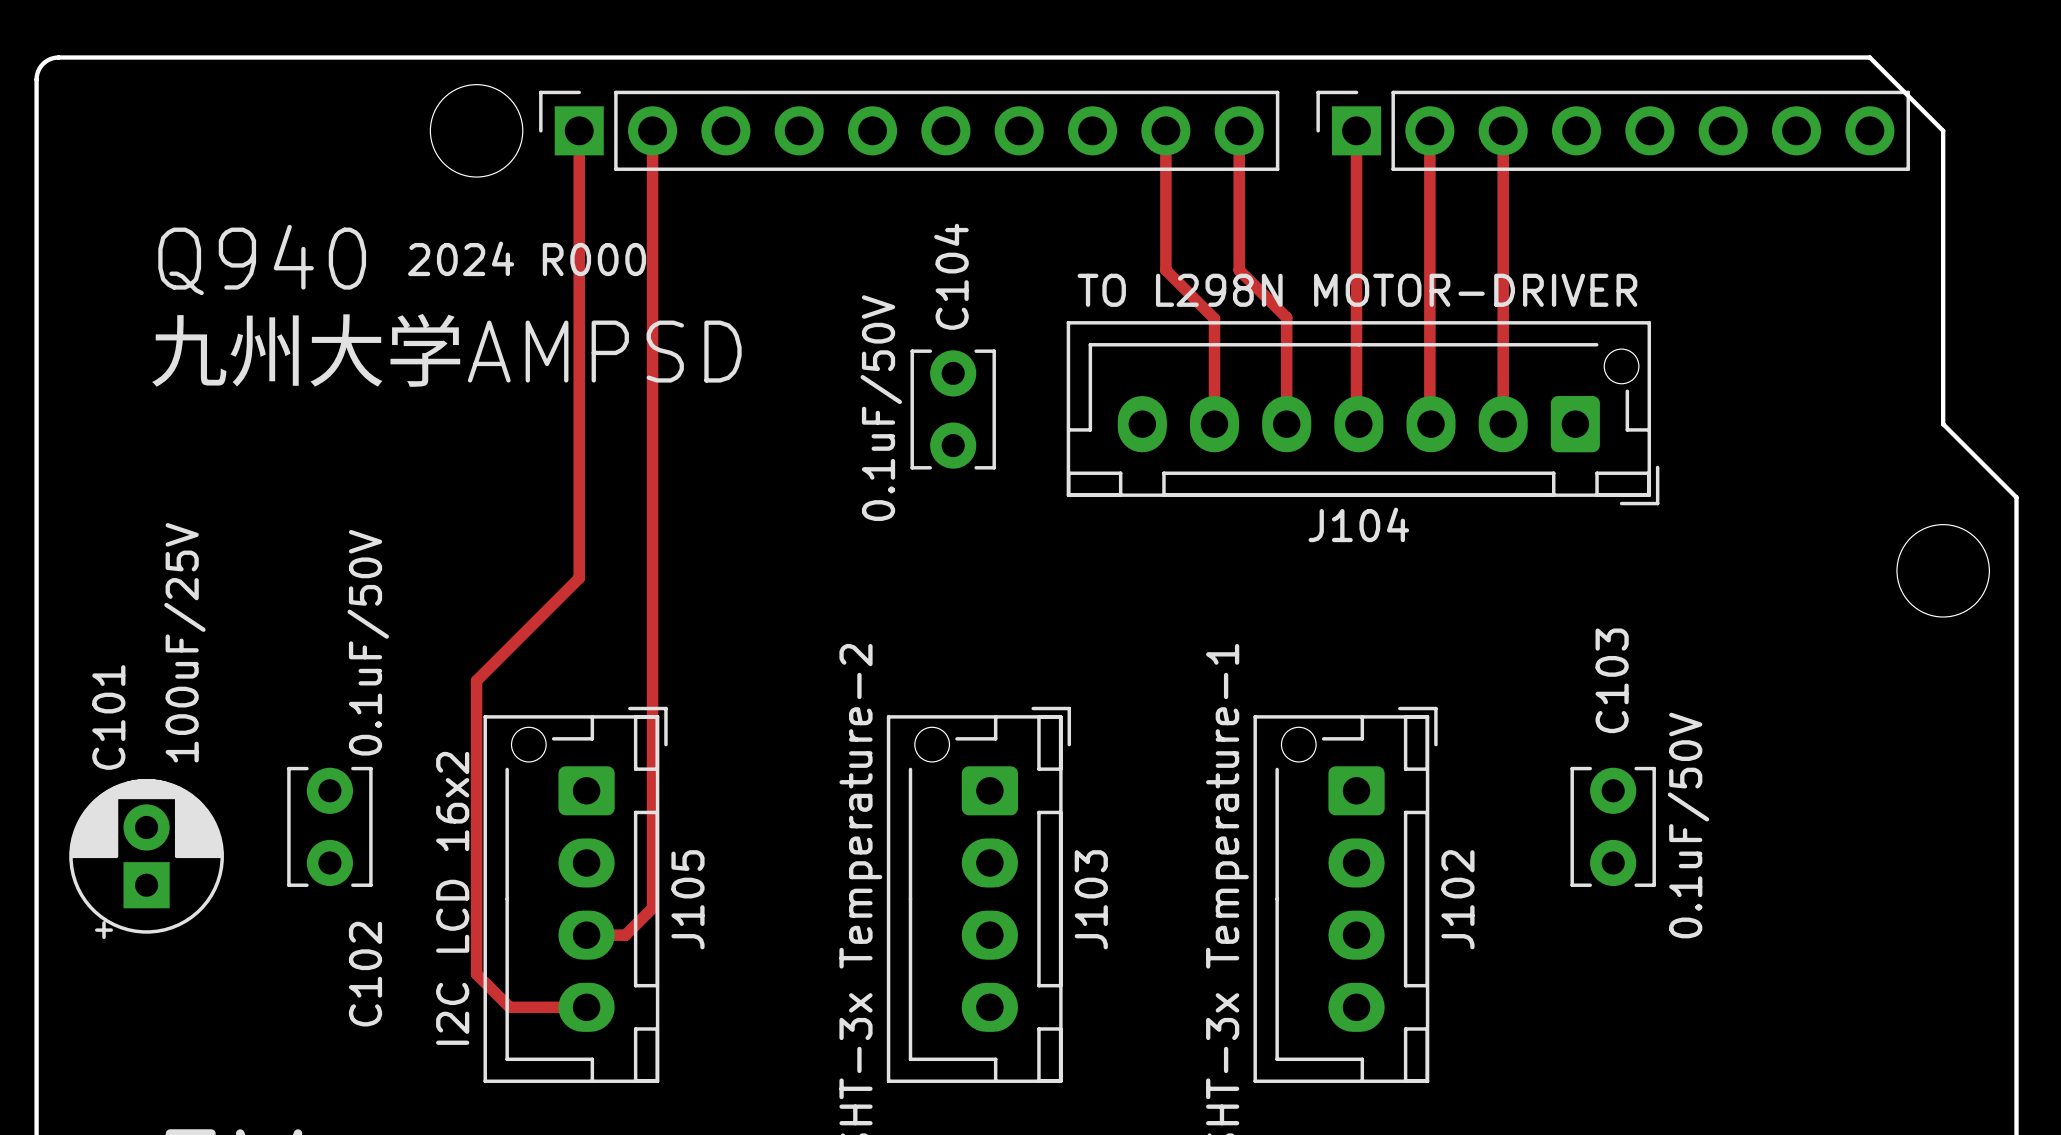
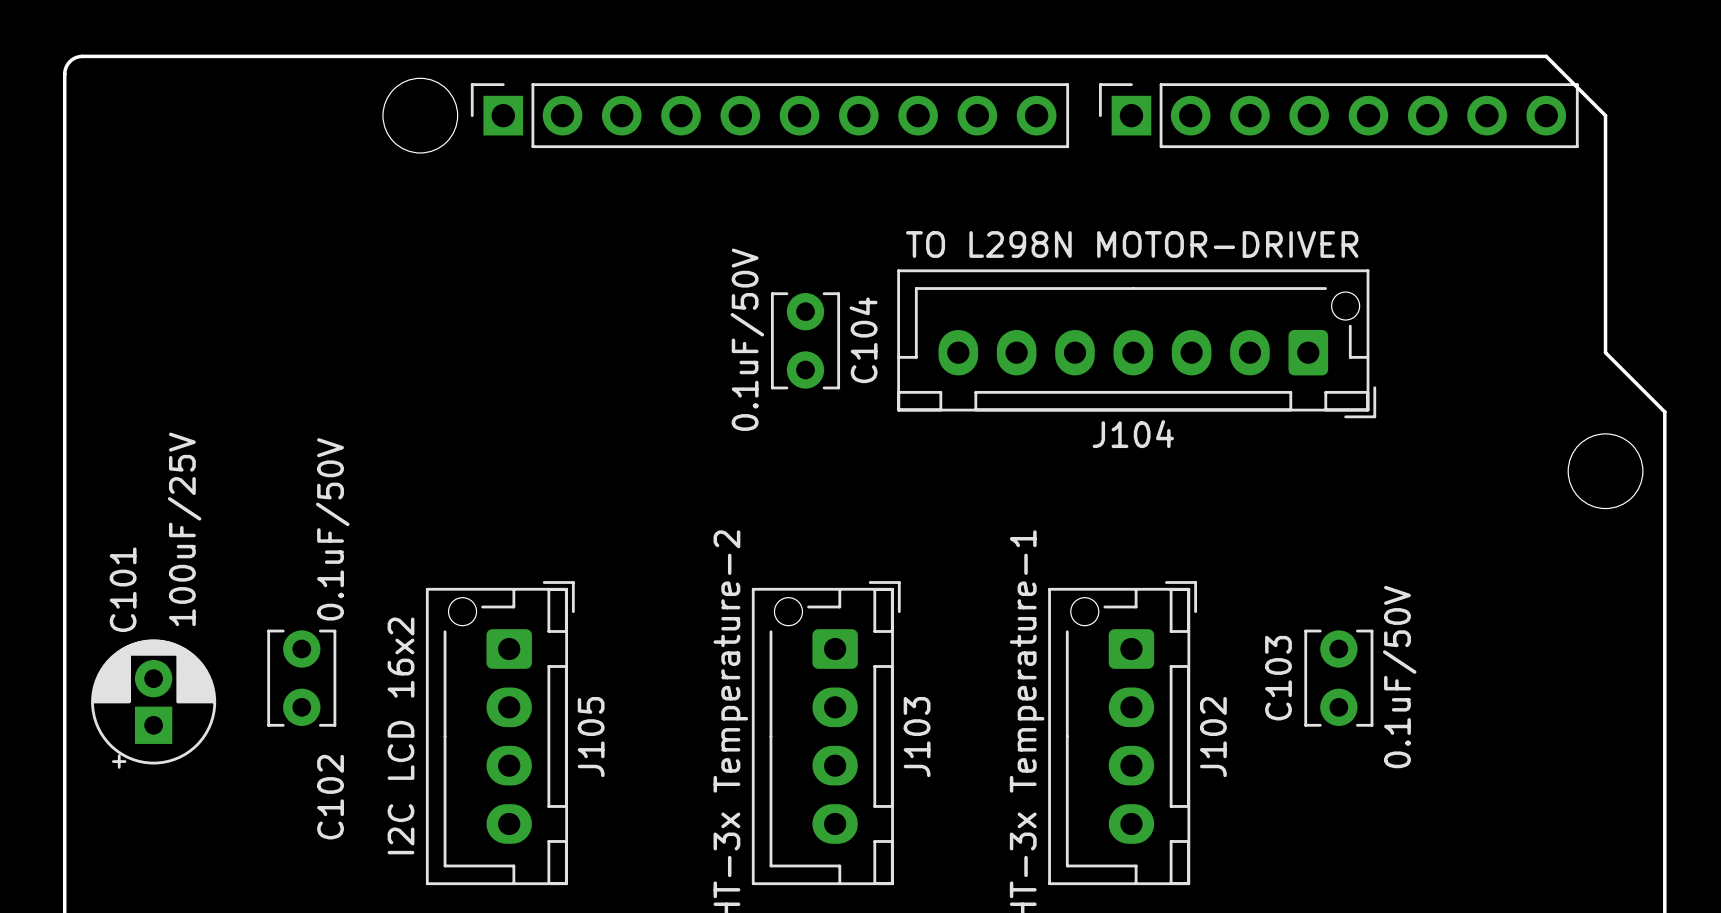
track: (579, 130) (579, 578) (476, 680) (476, 974) (509, 1007) (586, 1007) -> none
track: (652, 130) (652, 908) (625, 935) (586, 935) -> none
track: (1165, 130) (1165, 270) (1214, 318) (1214, 424) -> none
track: (1239, 130) (1239, 270) (1286, 317) (1286, 424) -> none
track: (1356, 130) (1356, 421) -> none
track: (1429, 130) (1429, 423) -> none
track: (1503, 130) (1503, 424) -> none
text: 2024 R000 (527, 258) -> none
text: Q940 (262, 259) -> none
C104 name position: C104 (951, 276) -> C104 (863, 340)
text: 九州大学AMPSD (445, 350) -> none
C103 name position: C103 (1612, 680) -> C103 (1278, 678)

